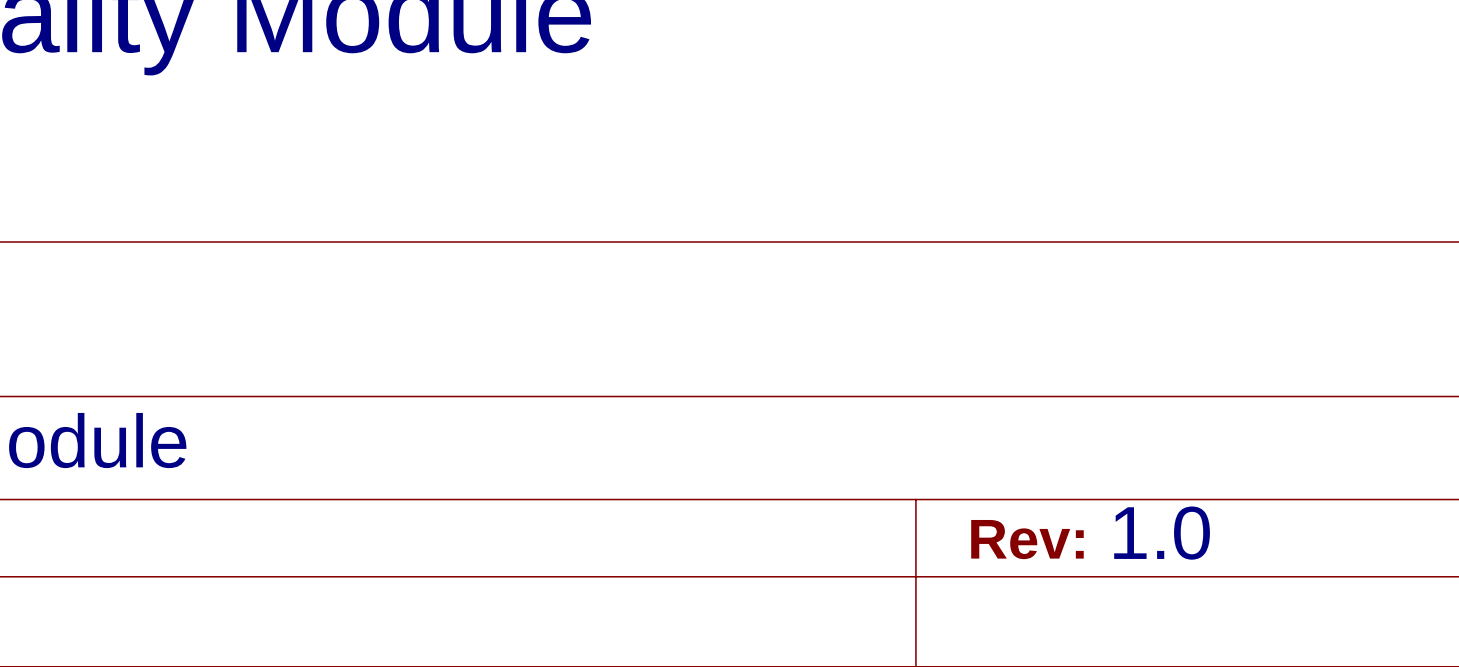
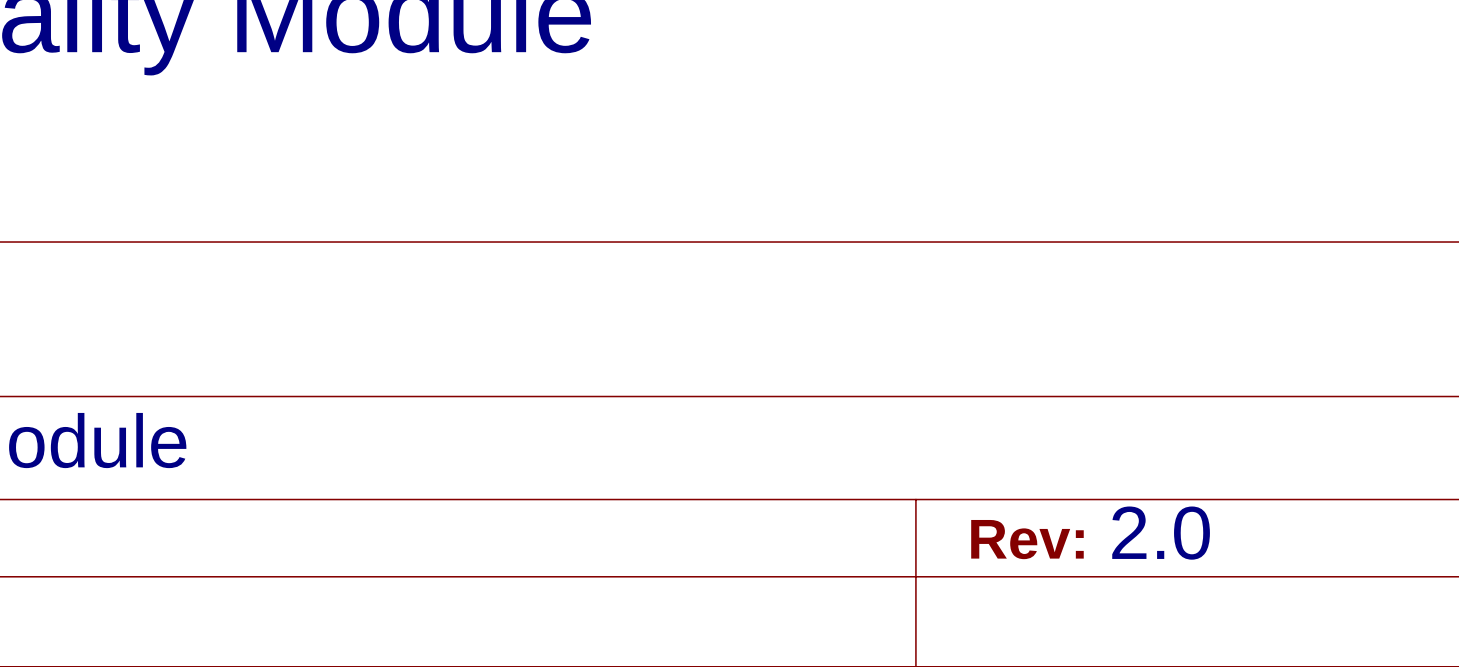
text: 1.0 (1162, 533) -> 2.0 (1161, 533)

